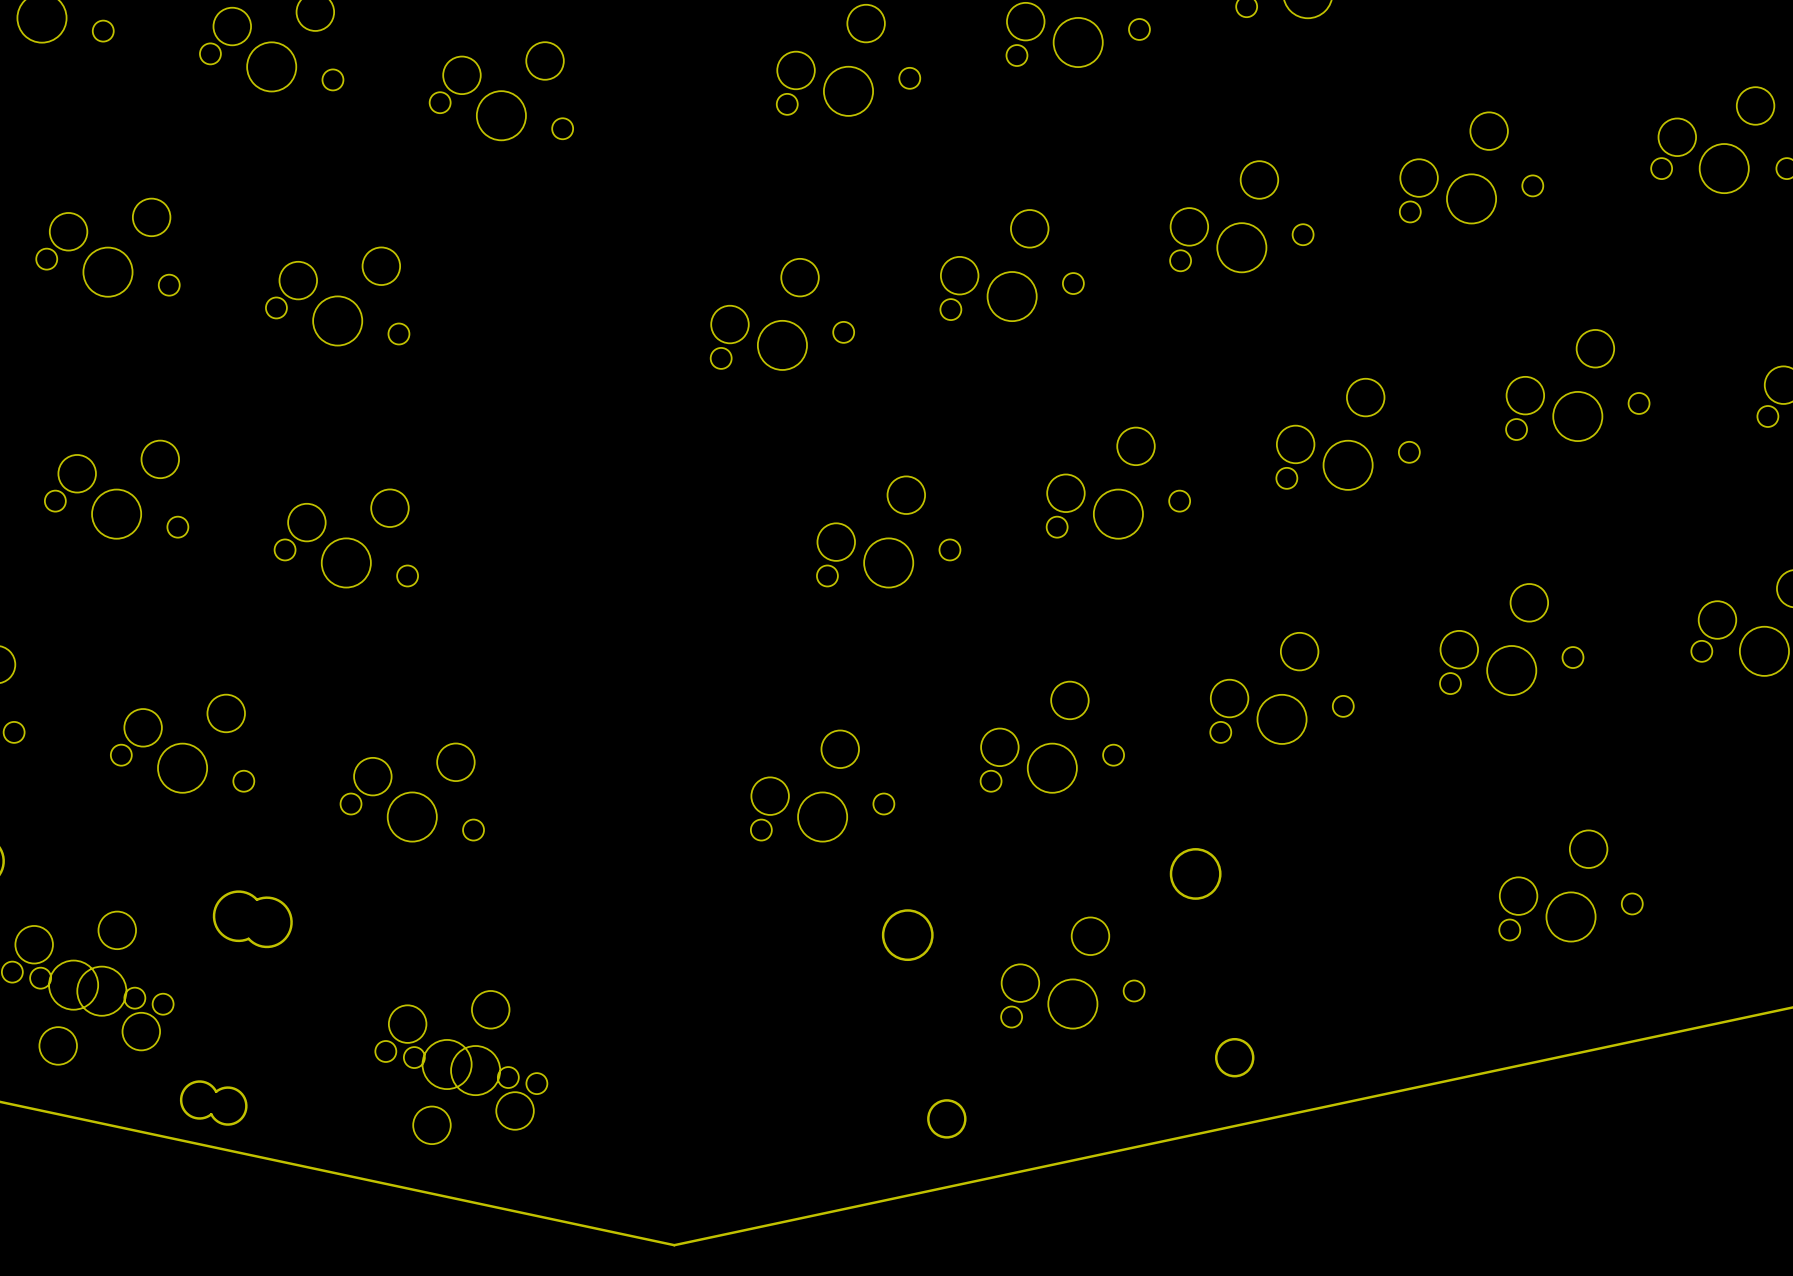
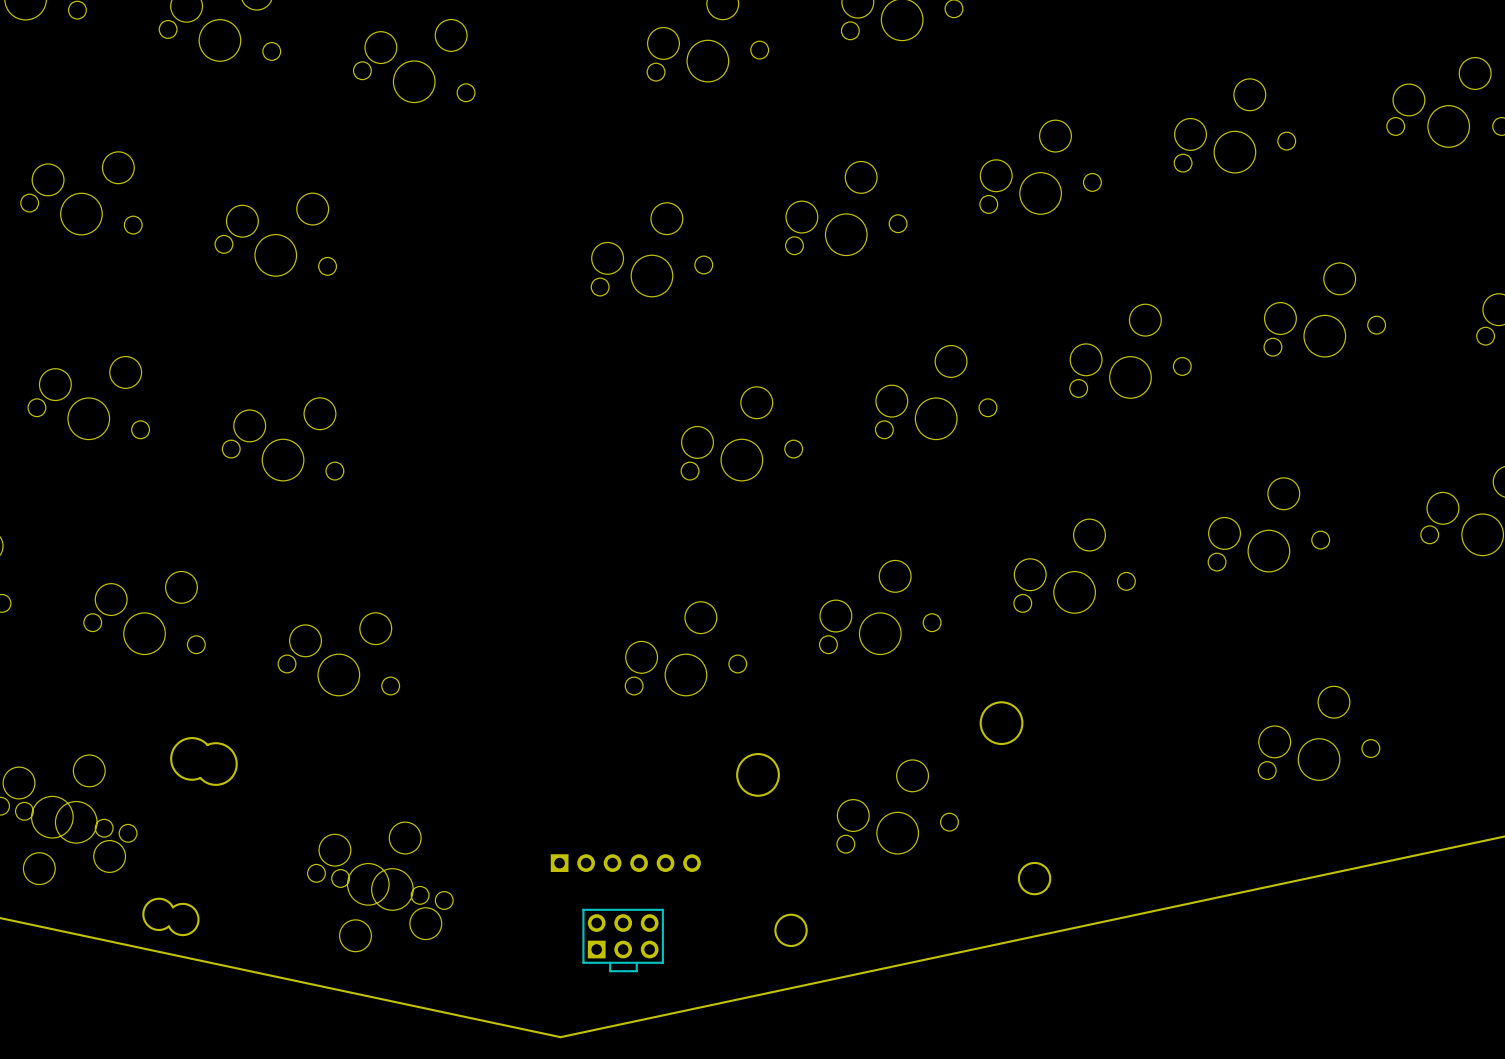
part: none -> (559, 863)
part: none -> (586, 863)
part: none -> (612, 863)
part: none -> (639, 863)
part: none -> (665, 863)
part: none -> (692, 863)
part: none -> (623, 940)

